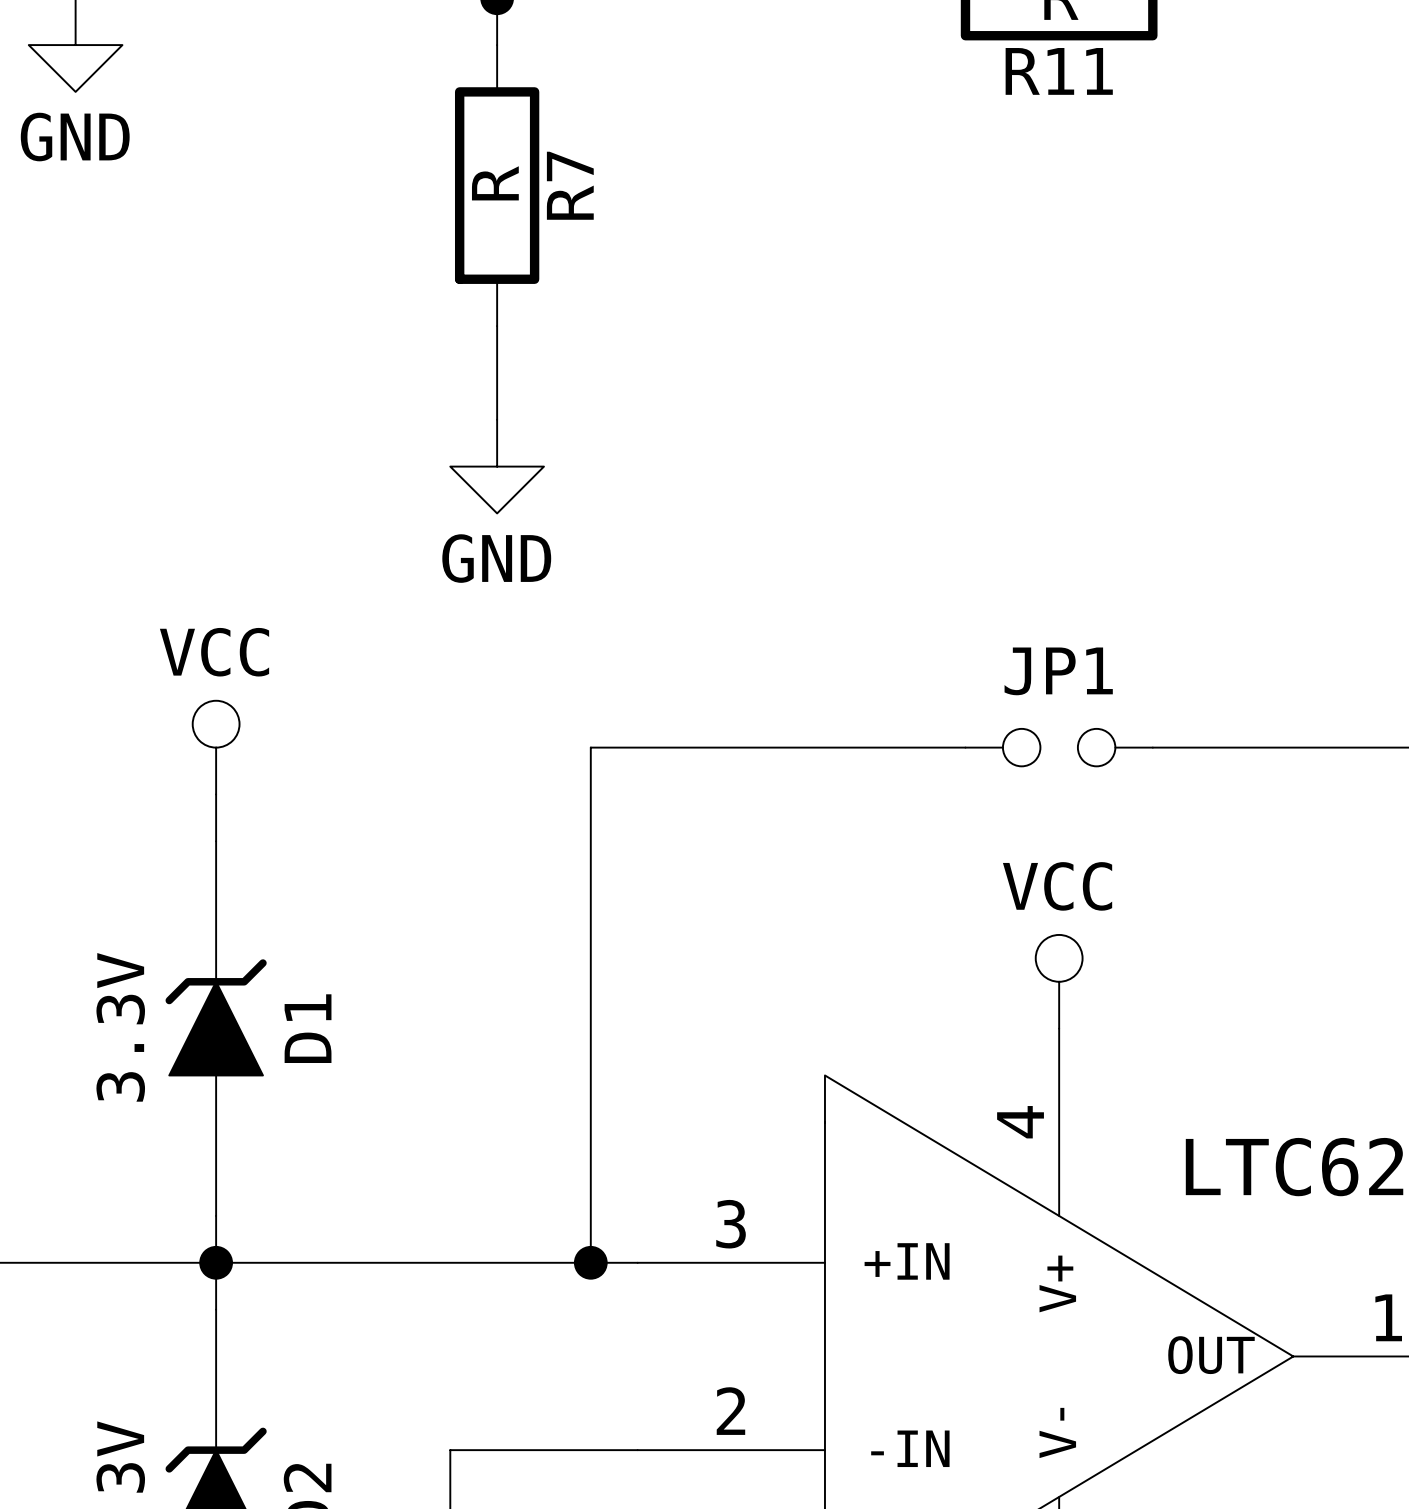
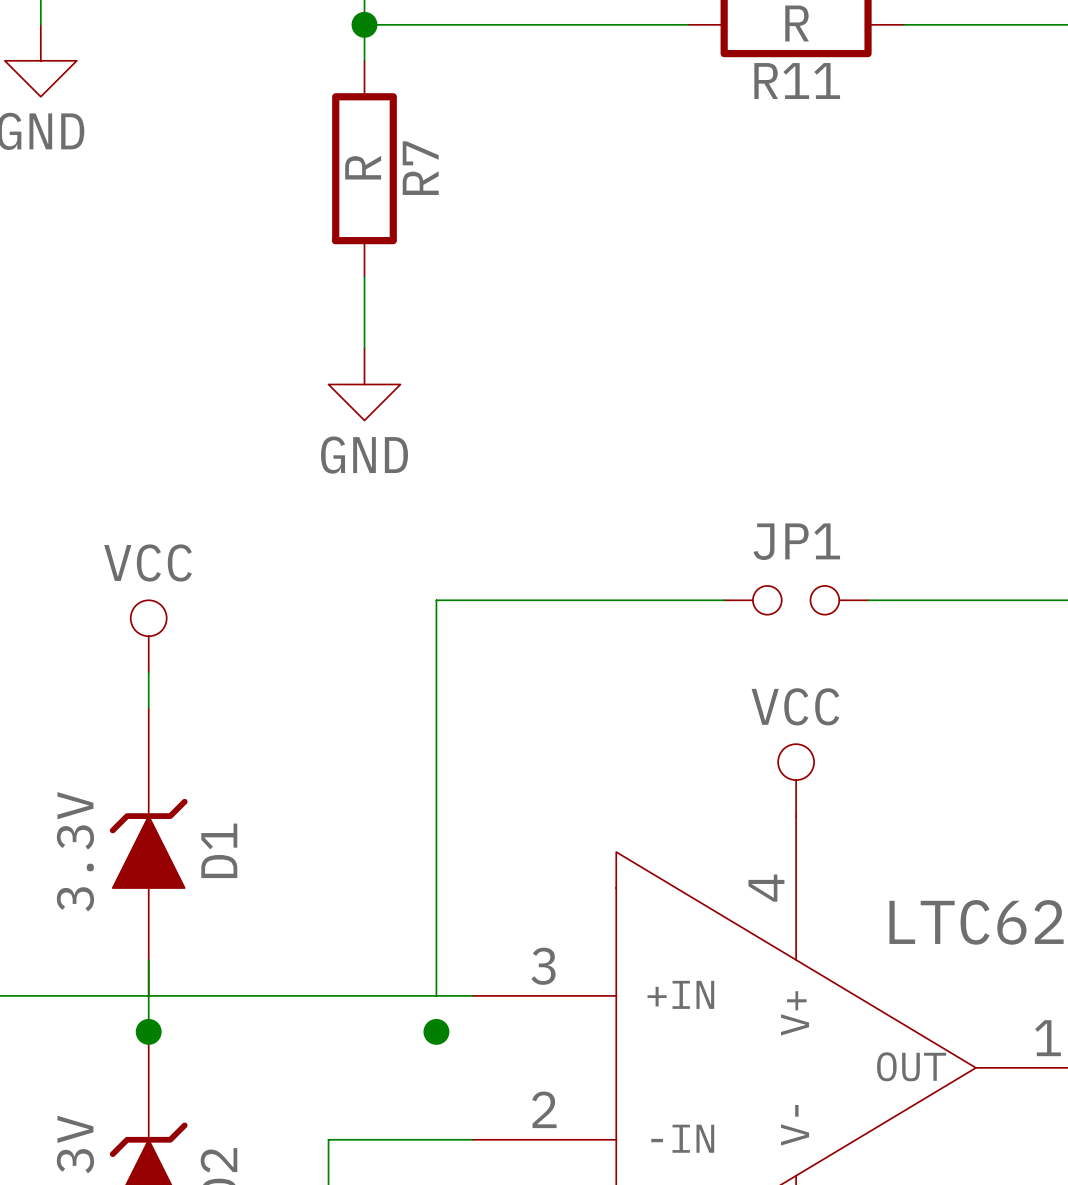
power symbol position: VCC (216, 747) -> VCC (148, 636)
D1 position: (216, 1028) -> (148, 852)
junction position: (216, 1262) -> (148, 1031)
junction position: (590, 1262) -> (436, 1031)

